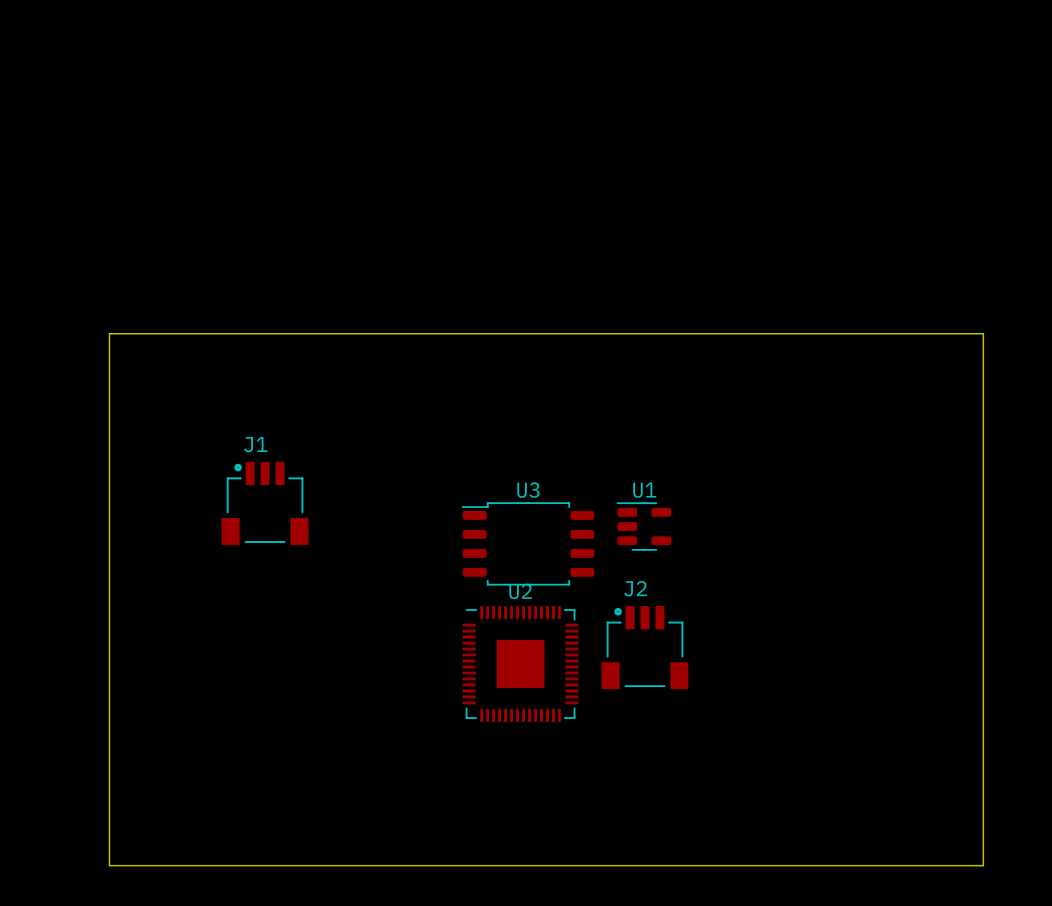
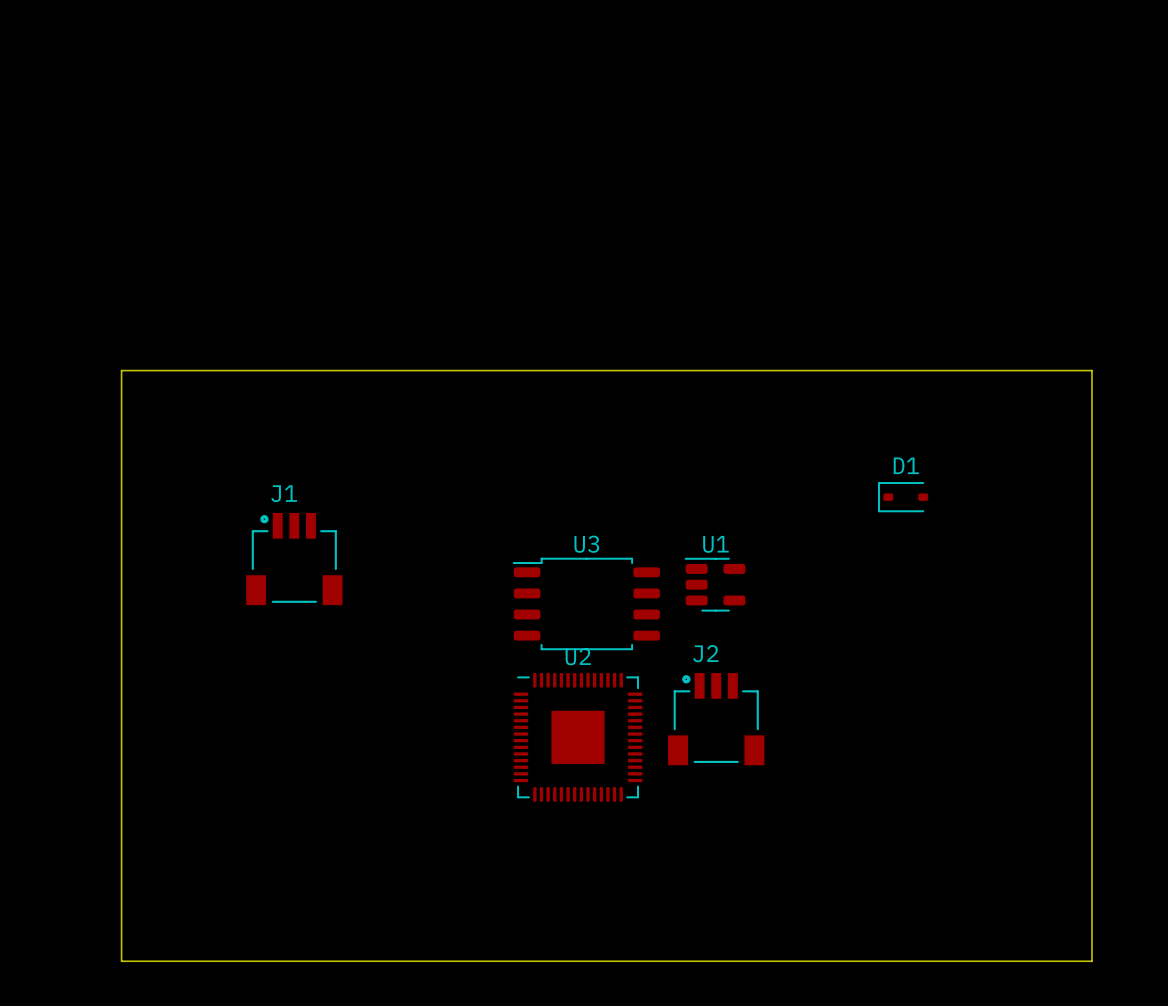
D1: none -> (903, 497)

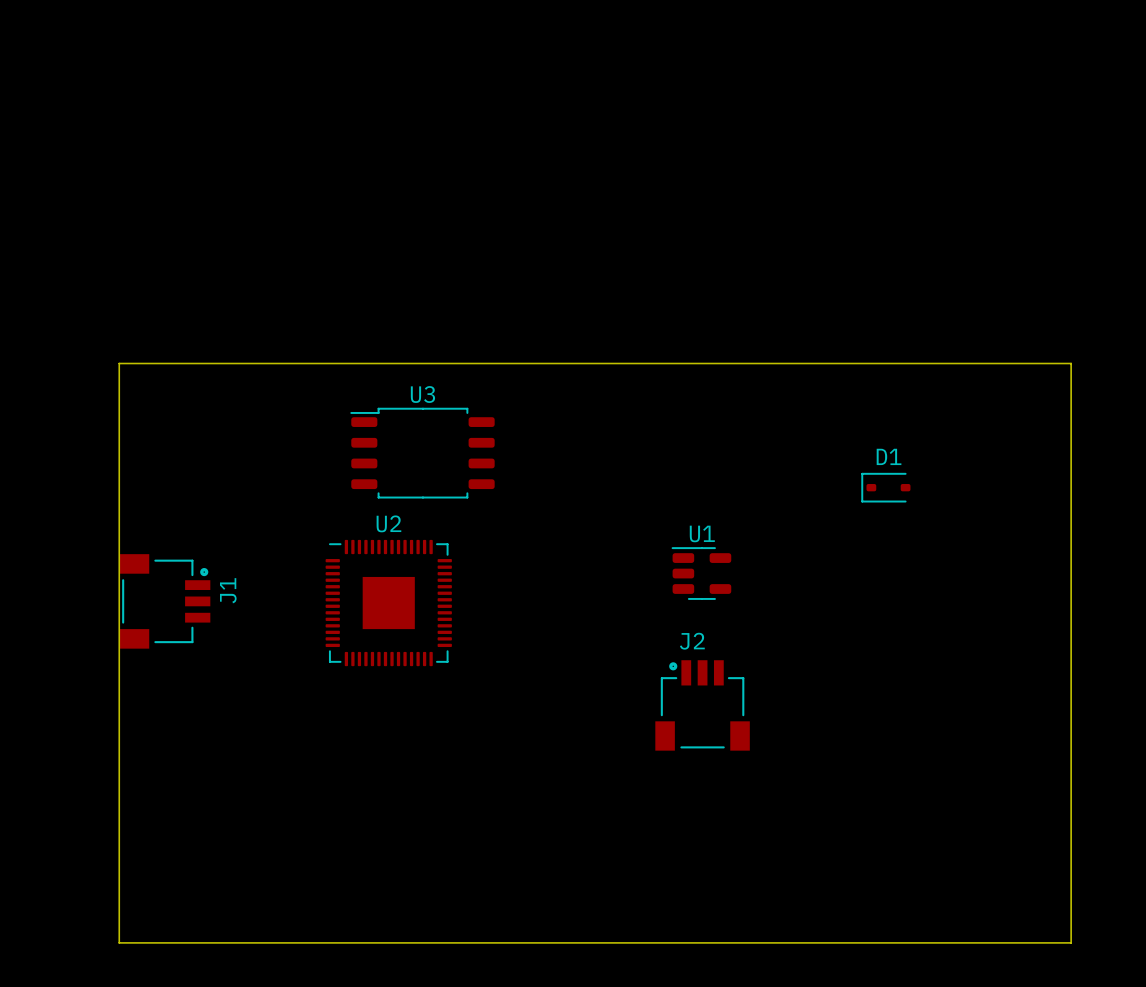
J1 rotation: 0° (294, 559) -> 90° clockwise (165, 601)
J1 position: (294, 559) -> (165, 601)
U3 position: (586, 603) -> (422, 453)
U2 position: (578, 737) -> (388, 603)

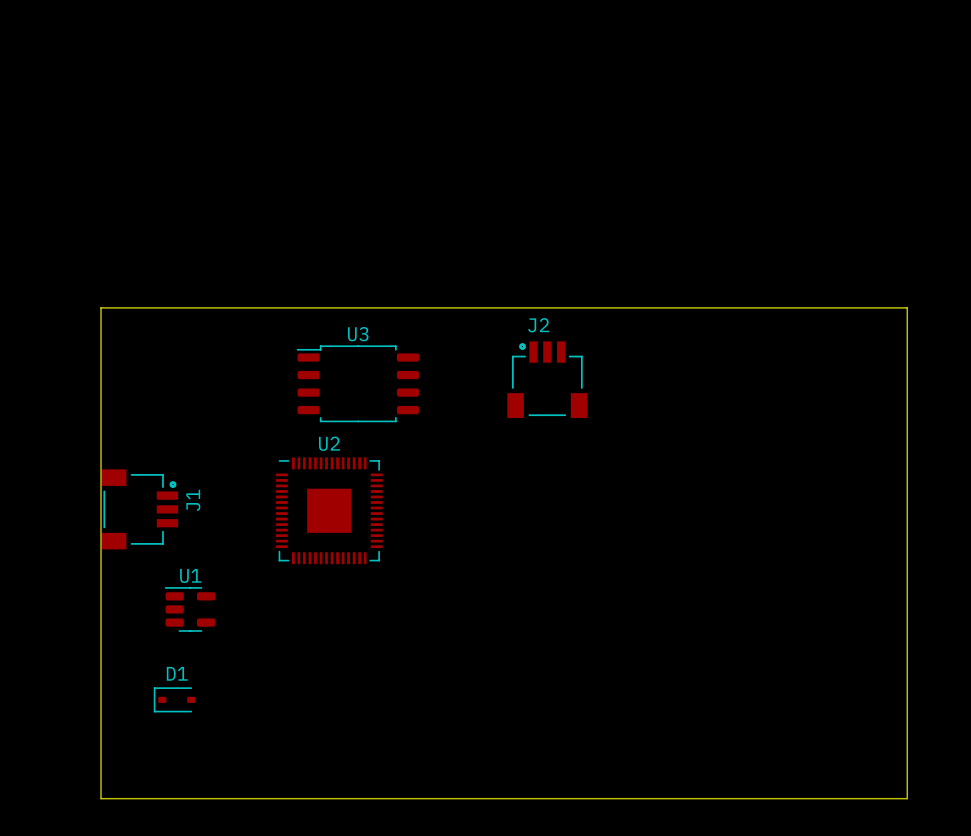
D1 position: (885, 487) -> (174, 699)
U1 position: (701, 573) -> (189, 609)
J2 position: (702, 705) -> (547, 379)

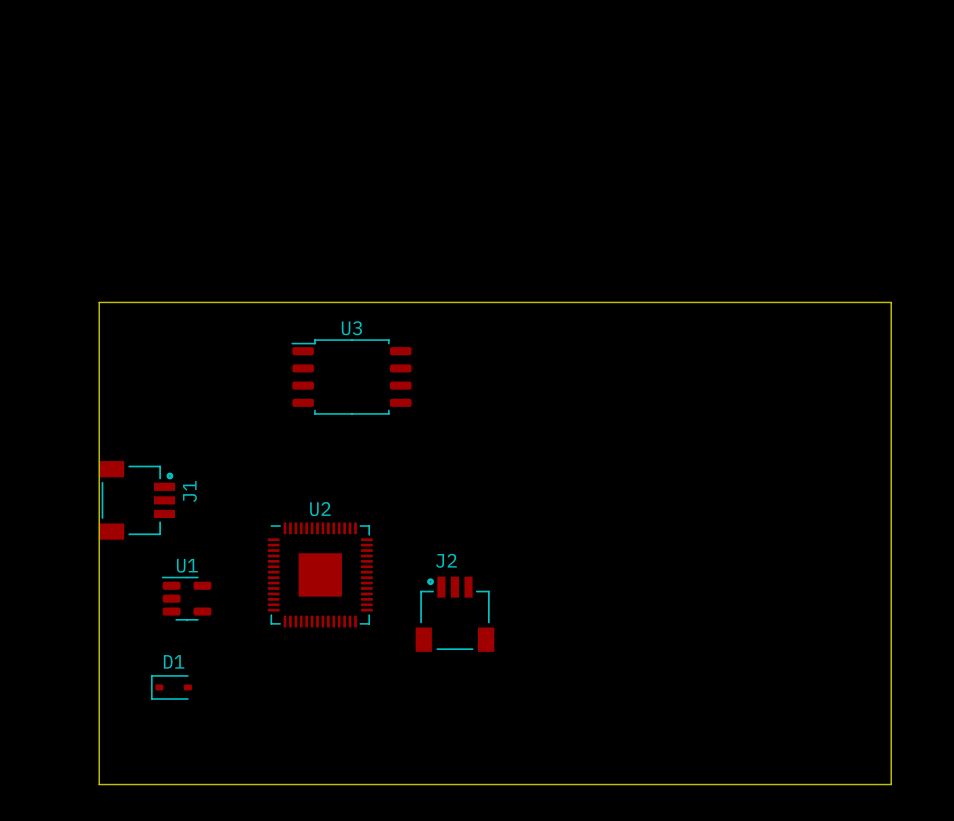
J2 position: (547, 379) -> (454, 614)
U2 position: (329, 510) -> (320, 574)

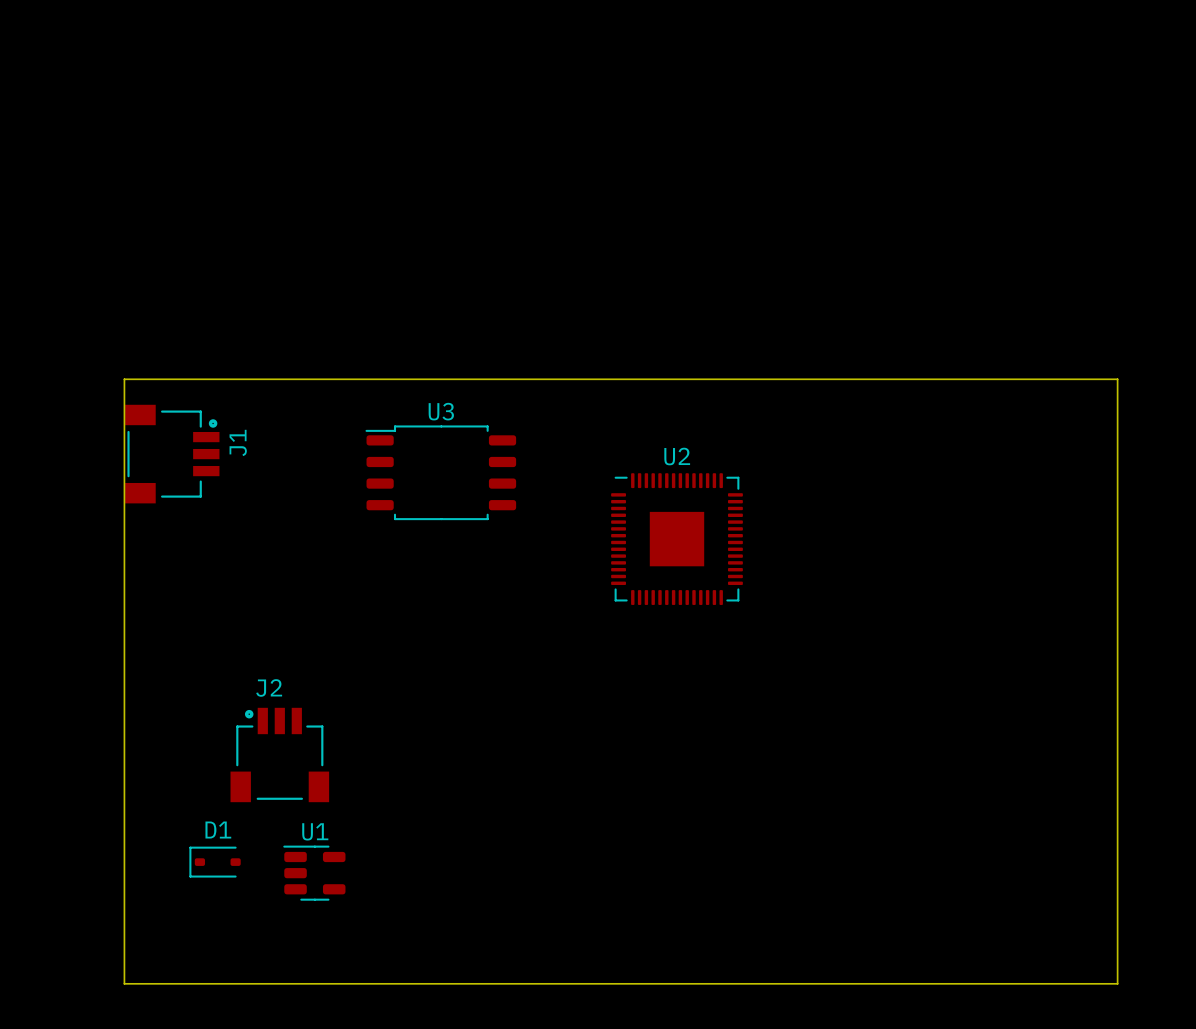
J1 position: (137, 500) -> (172, 454)
U2 position: (320, 574) -> (676, 539)
U1 position: (186, 598) -> (314, 873)
J2 position: (454, 614) -> (279, 754)

